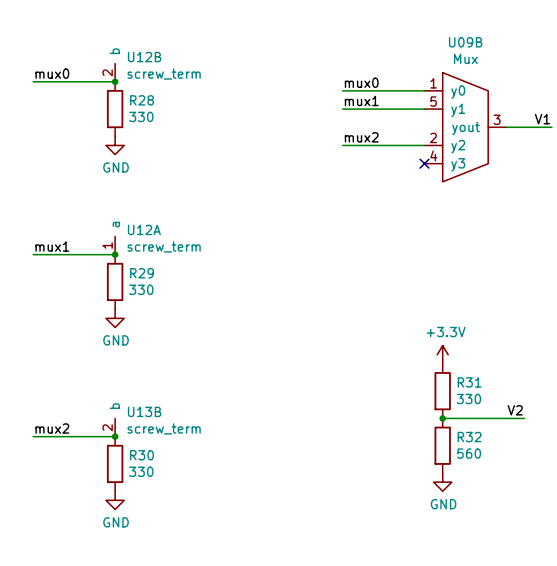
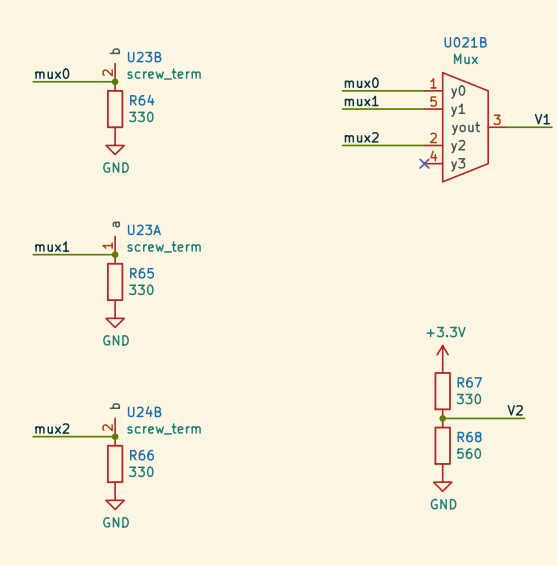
U09B name: U09B (465, 42) -> U021B (465, 42)
U12B name: U12B (144, 57) -> U23B (144, 57)
R28 name: R28 (142, 100) -> R64 (142, 100)
U12A name: U12A (144, 229) -> U23A (144, 229)
R29 name: R29 (142, 273) -> R65 (142, 273)
R31 name: R31 (469, 382) -> R67 (469, 382)
U13B name: U13B (144, 411) -> U24B (144, 411)
R32 name: R32 (469, 437) -> R68 (469, 437)
R30 name: R30 (142, 455) -> R66 (142, 455)

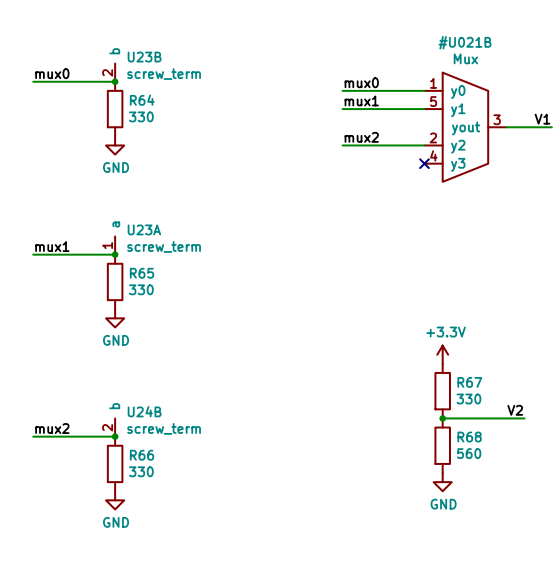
U021B: Mux (465, 127) -> none
#U021B: none -> Mux (465, 127)

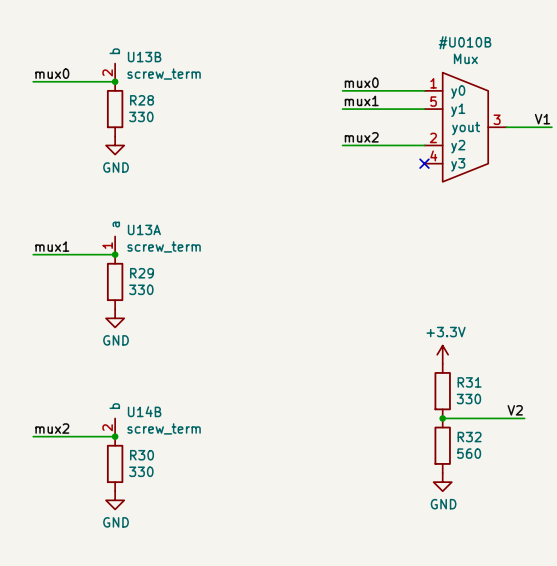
#U021B name: #U021B (465, 42) -> #U010B (465, 42)
U23B name: U23B (144, 57) -> U13B (144, 57)
R64 name: R64 (142, 100) -> R28 (142, 100)
U23A name: U23A (144, 229) -> U13A (144, 229)
R65 name: R65 (142, 273) -> R29 (142, 273)
R67 name: R67 (469, 382) -> R31 (469, 382)
U24B name: U24B (144, 411) -> U14B (144, 411)
R68 name: R68 (469, 437) -> R32 (469, 437)
R66 name: R66 (142, 455) -> R30 (142, 455)

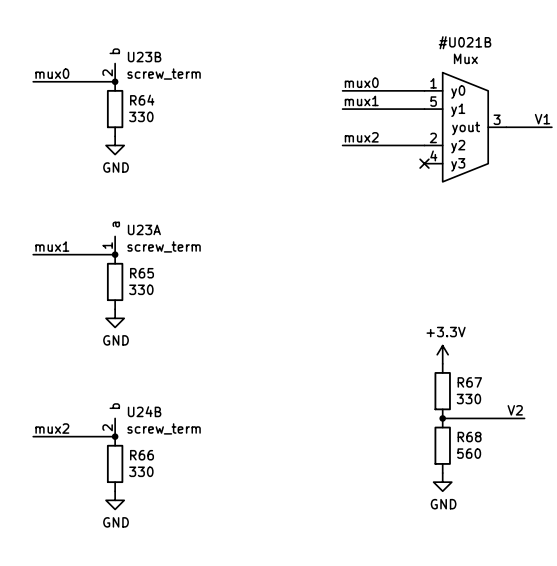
#U010B name: #U010B (465, 42) -> #U021B (465, 42)
U13B name: U13B (144, 57) -> U23B (144, 57)
R28 name: R28 (142, 100) -> R64 (142, 100)
U13A name: U13A (144, 229) -> U23A (144, 229)
R29 name: R29 (142, 273) -> R65 (142, 273)
R31 name: R31 (469, 382) -> R67 (469, 382)
U14B name: U14B (144, 411) -> U24B (144, 411)
R32 name: R32 (469, 437) -> R68 (469, 437)
R30 name: R30 (142, 455) -> R66 (142, 455)

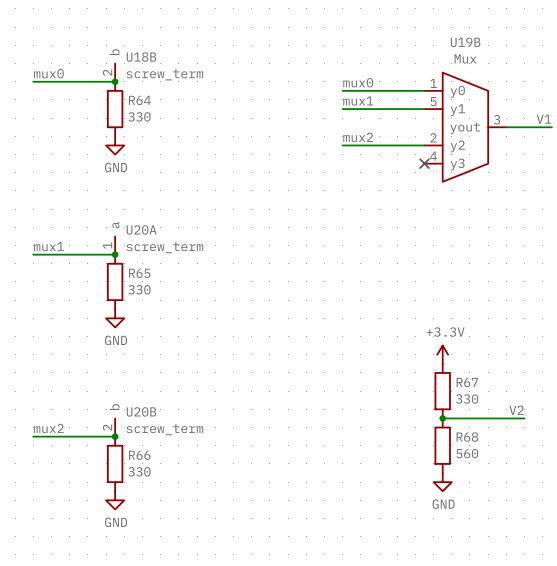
U23B name: U23B (144, 57) -> U18B (141, 57)
U19B: none -> Mux (465, 127)
#U021B: Mux (465, 127) -> none
U23A name: U23A (144, 229) -> U20A (141, 229)
U24B name: U24B (144, 411) -> U20B (141, 411)

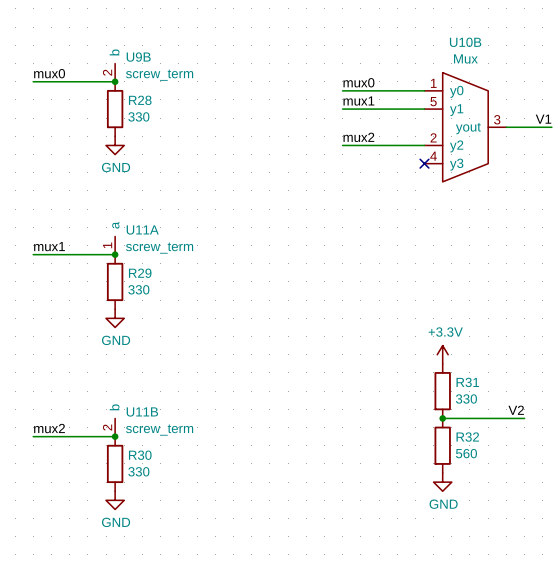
U19B name: U19B (465, 42) -> U10B (465, 42)
U18B name: U18B (141, 57) -> U9B (138, 57)
R64 name: R64 (139, 100) -> R28 (140, 100)
U20A name: U20A (141, 229) -> U11A (142, 229)
R65 name: R65 (139, 273) -> R29 (140, 273)
R67 name: R67 (467, 382) -> R31 (467, 382)
U20B name: U20B (141, 411) -> U11B (142, 411)
R68 name: R68 (467, 437) -> R32 (467, 437)
R66 name: R66 (139, 455) -> R30 (140, 455)

